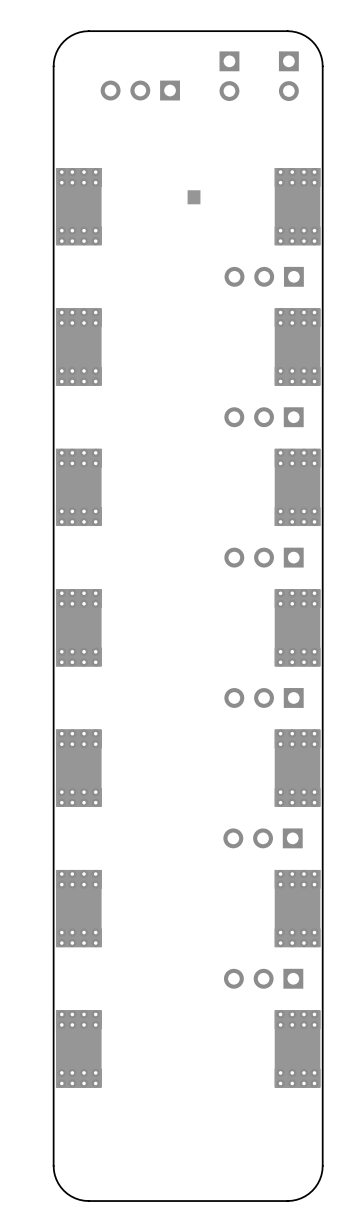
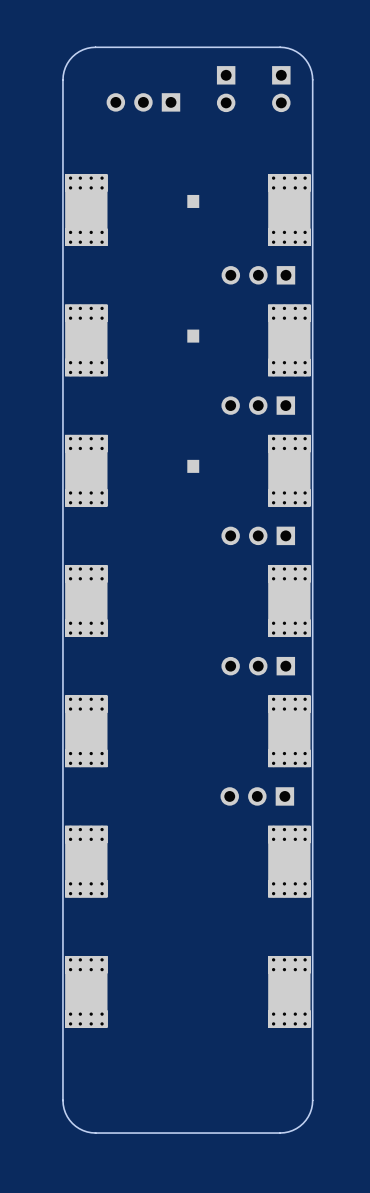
part: none -> (193, 336)
part: none -> (193, 466)
part: (263, 978) -> none

